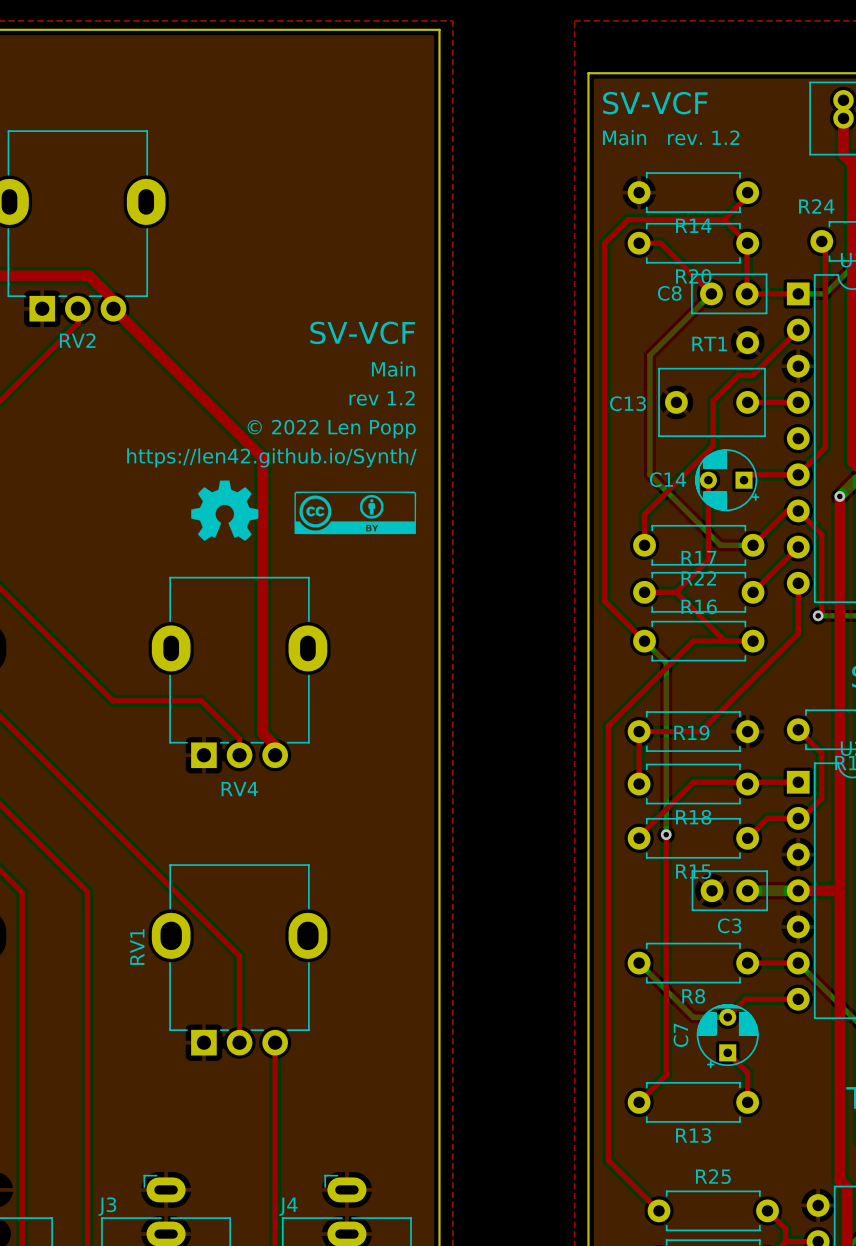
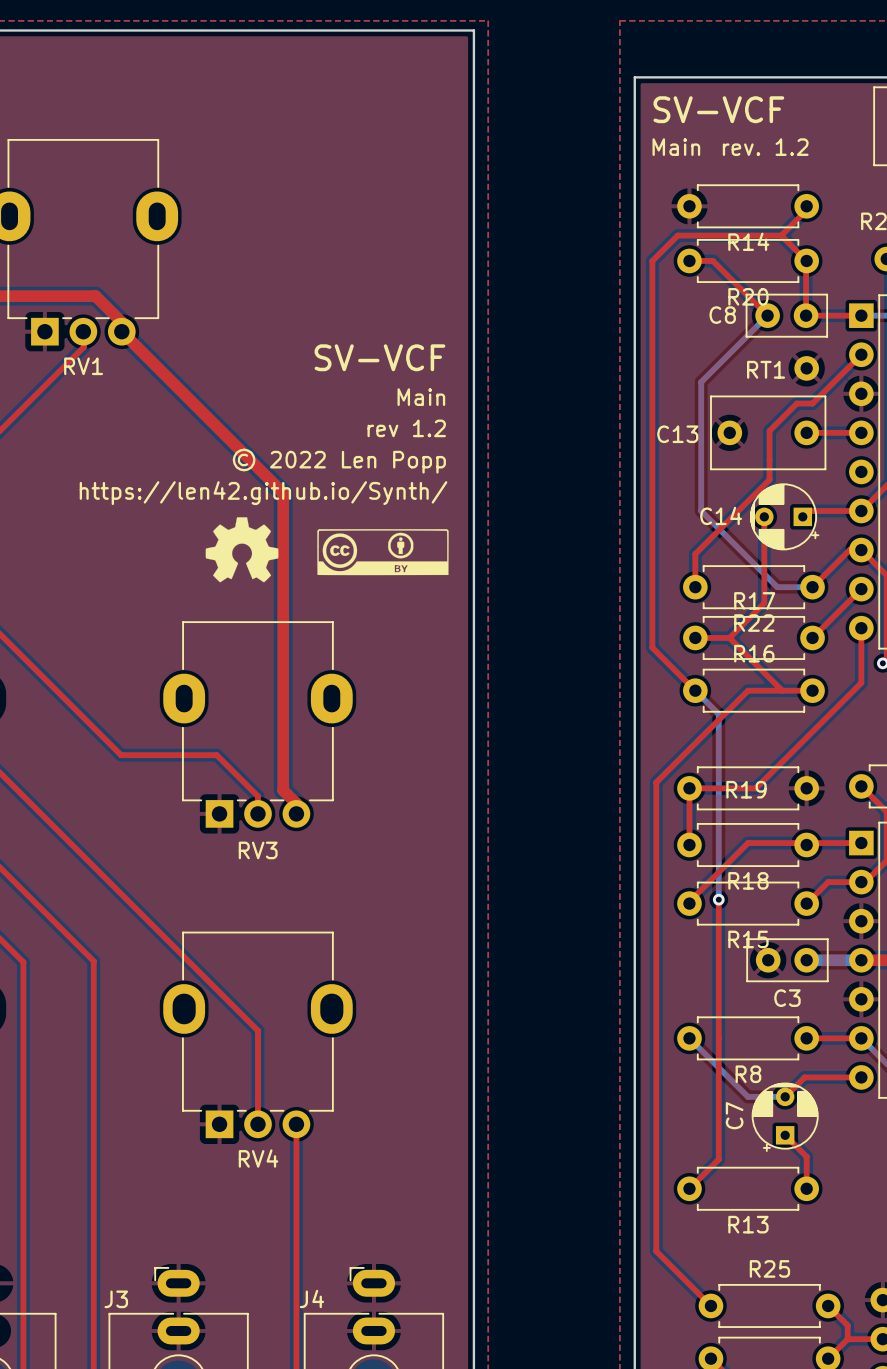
RV2 name: RV2 (77, 340) -> RV1 (83, 366)
RV4 name: RV4 (239, 789) -> RV3 (258, 850)
RV1 name: RV1 (137, 947) -> RV4 (258, 1158)

